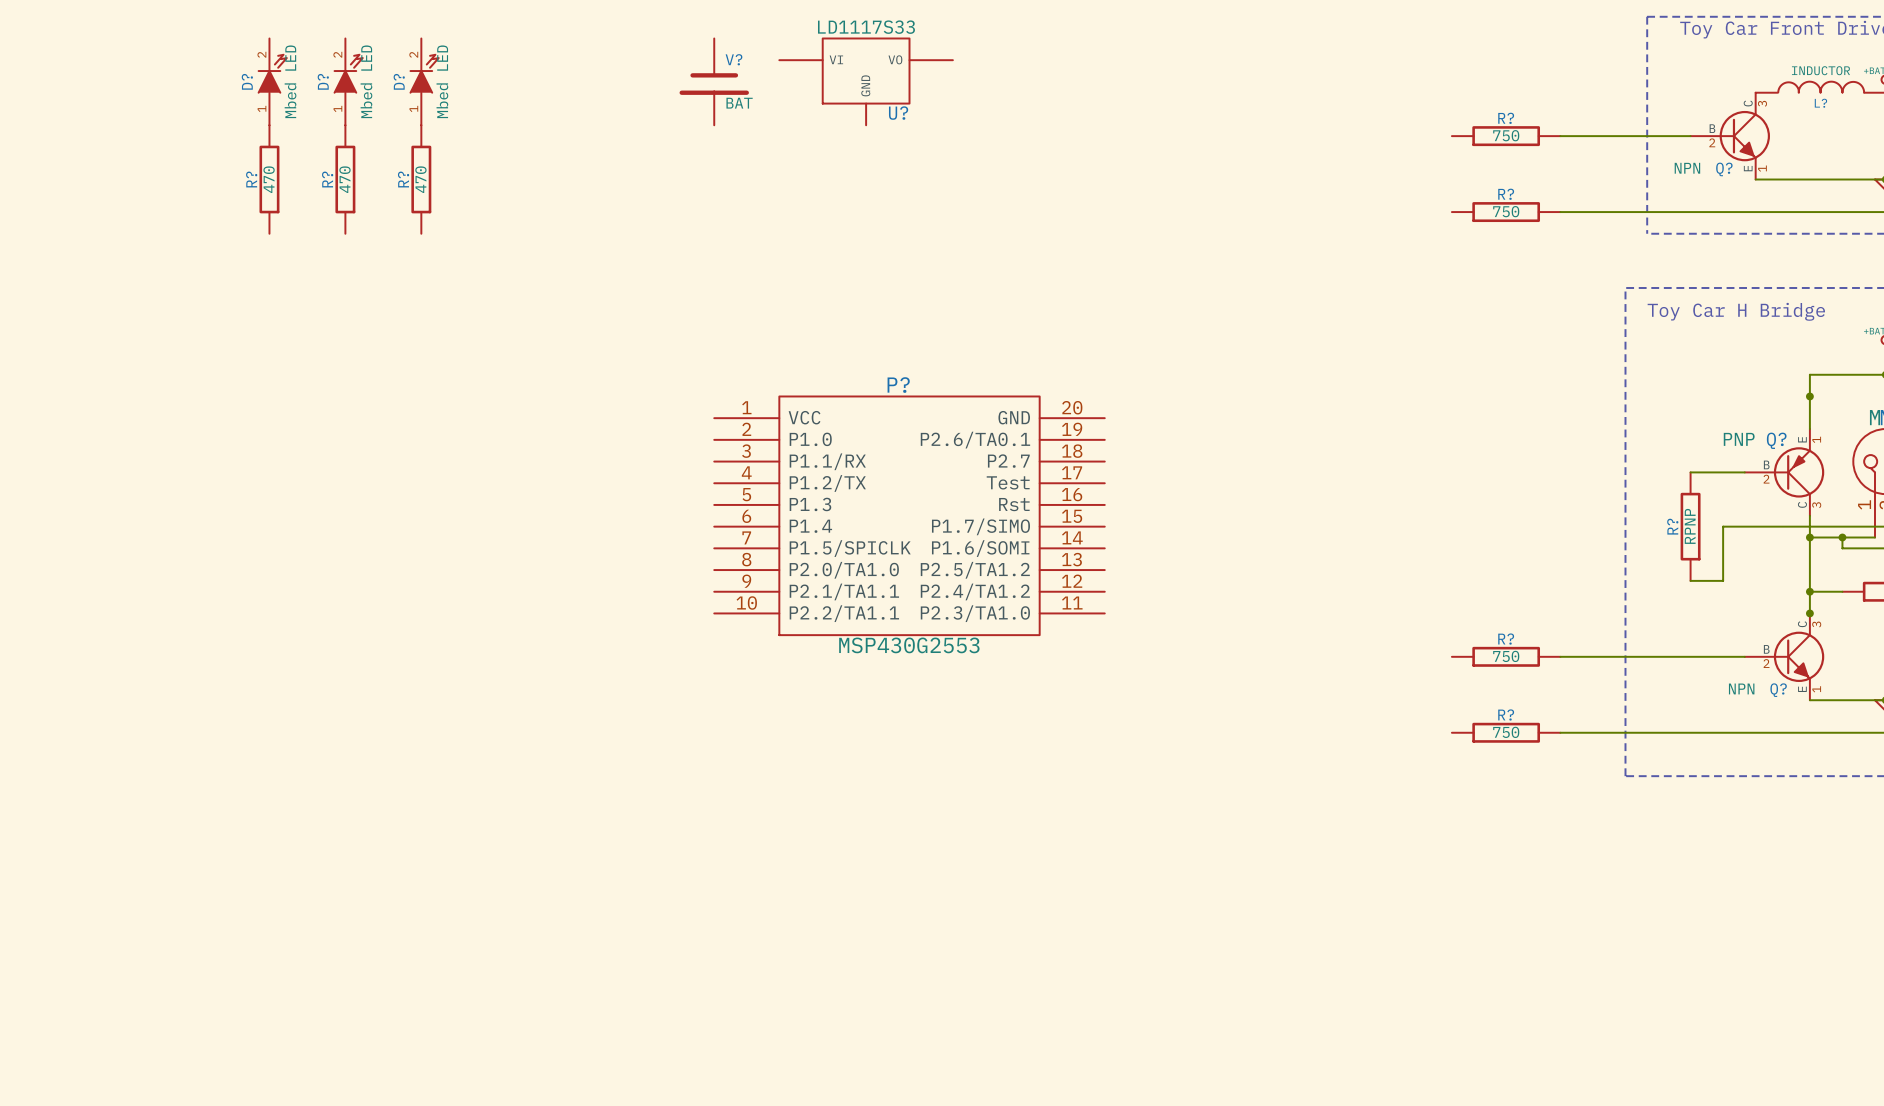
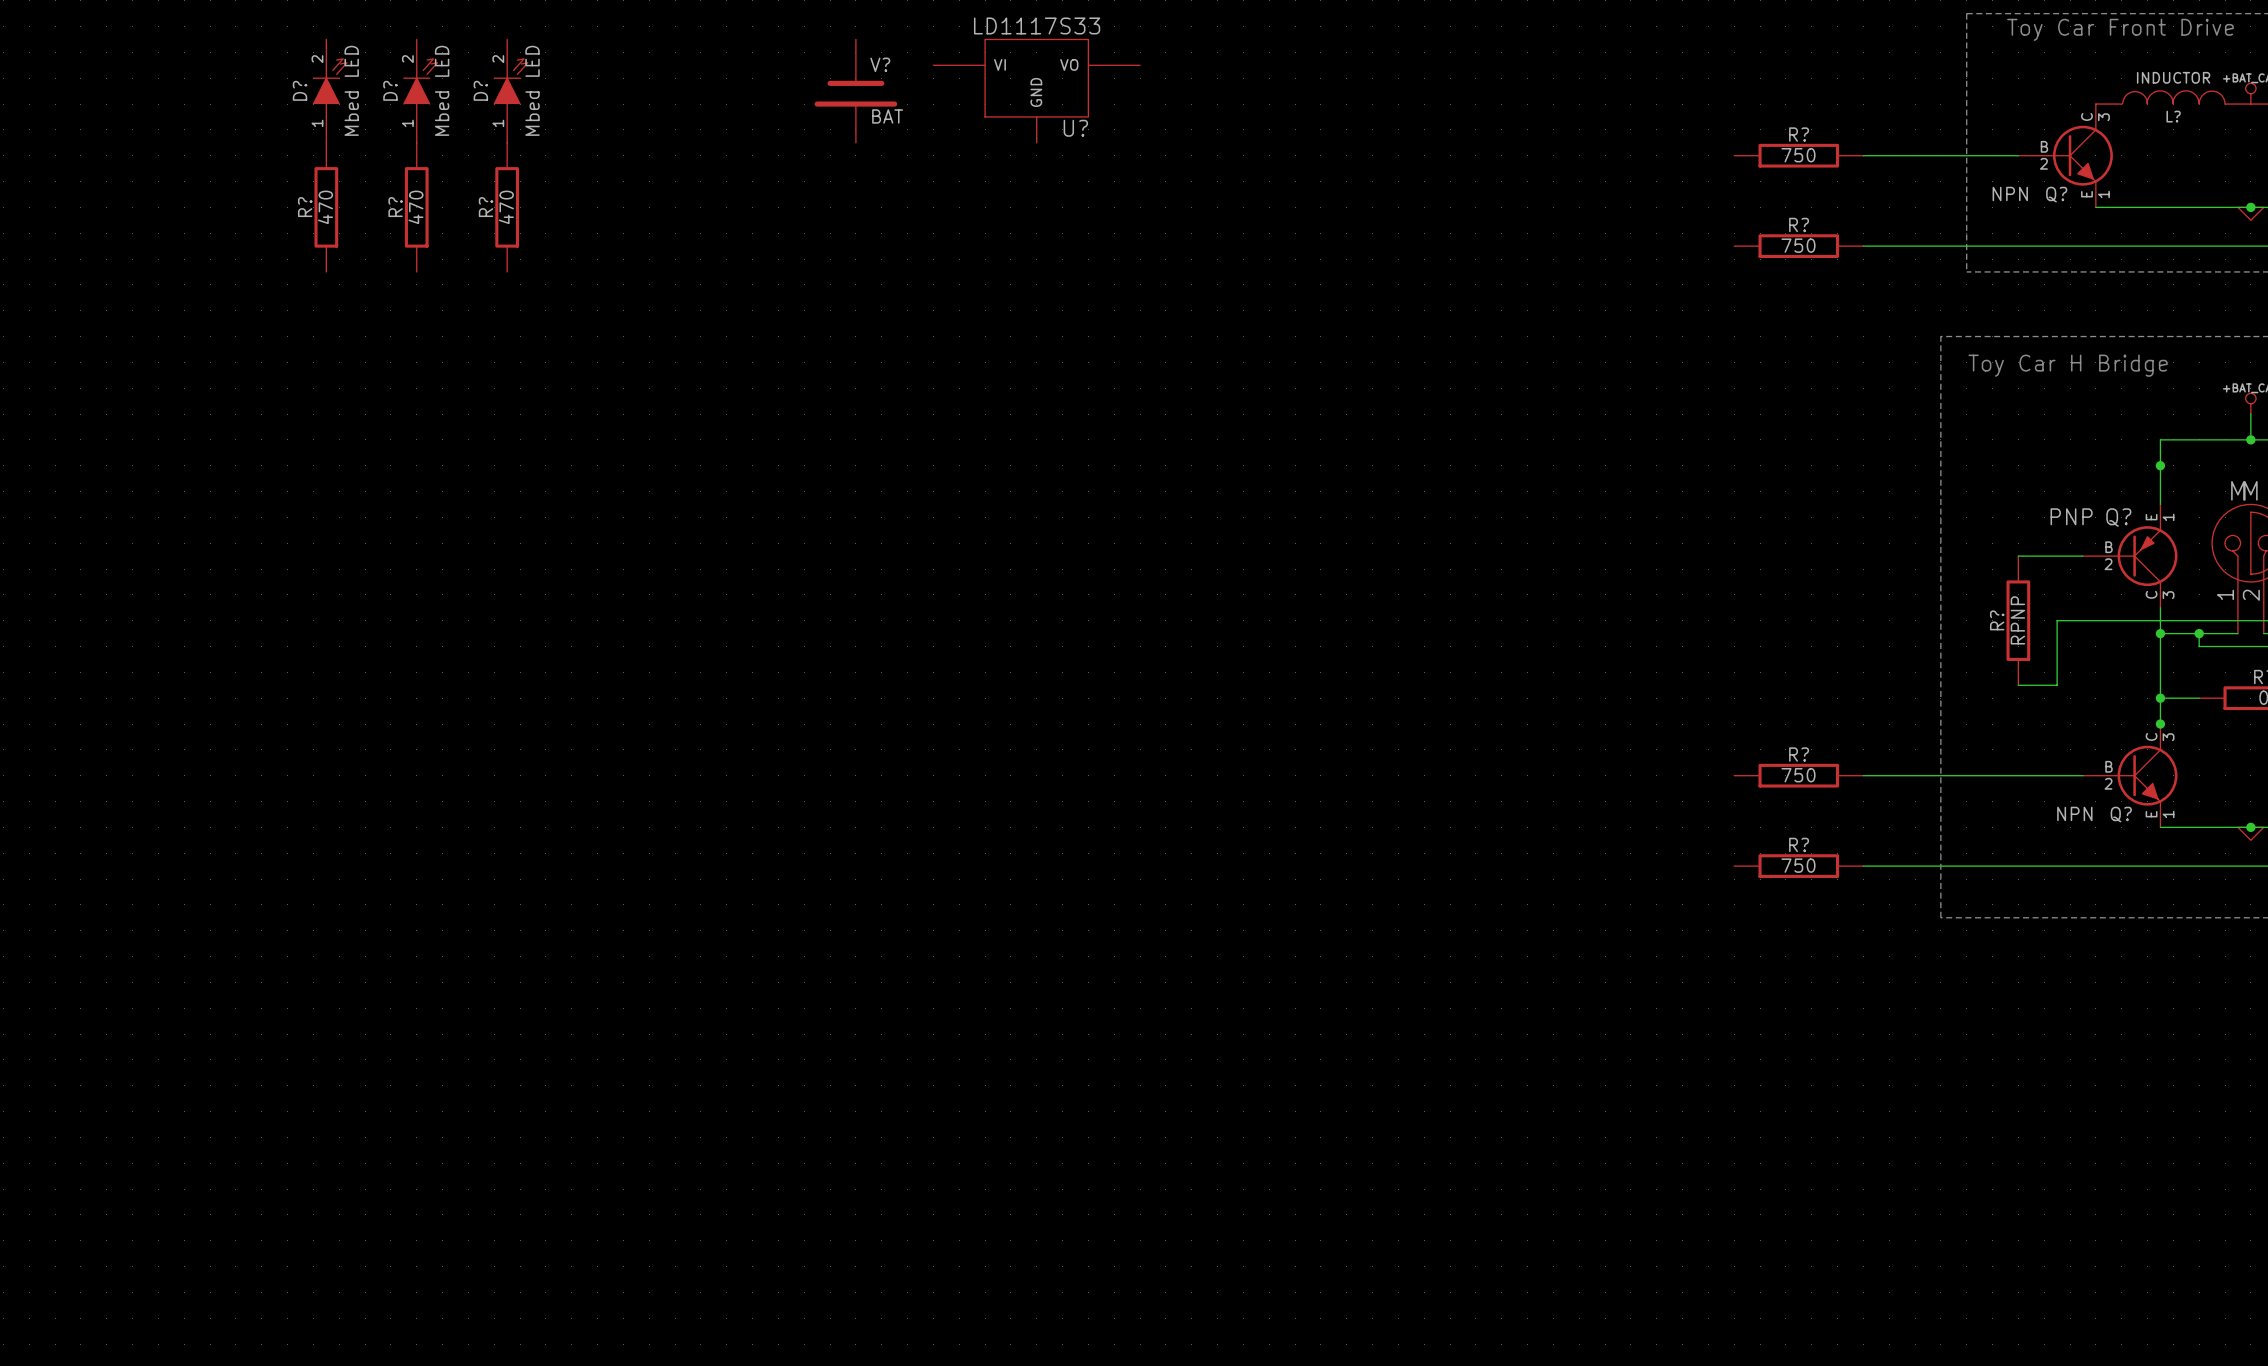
P?: MSP430G2553 (909, 515) -> none

